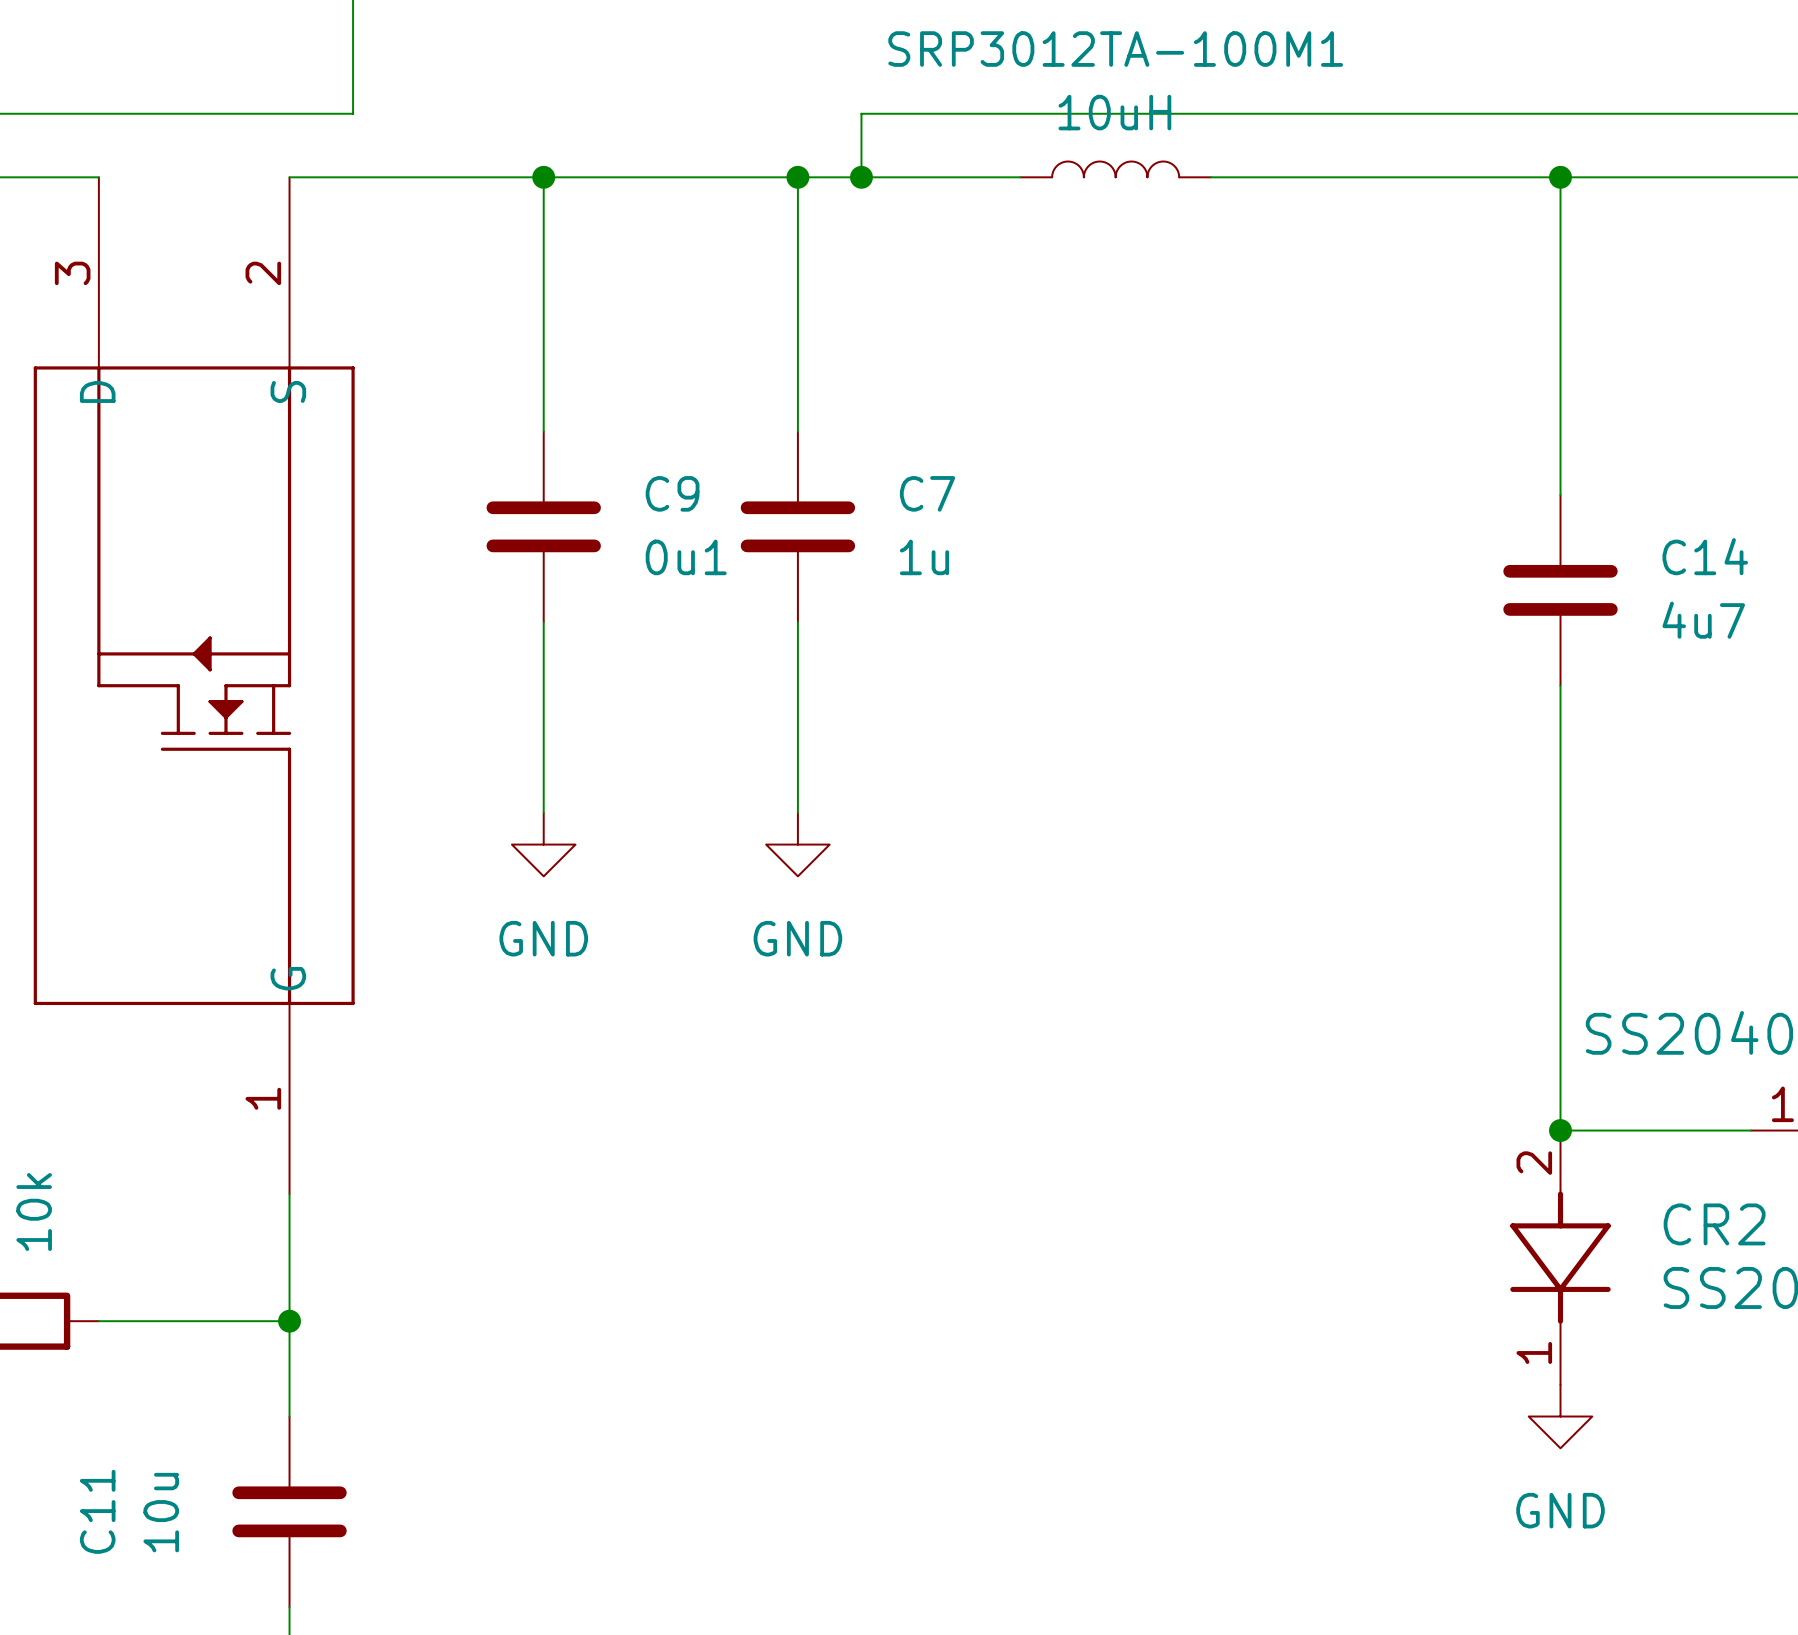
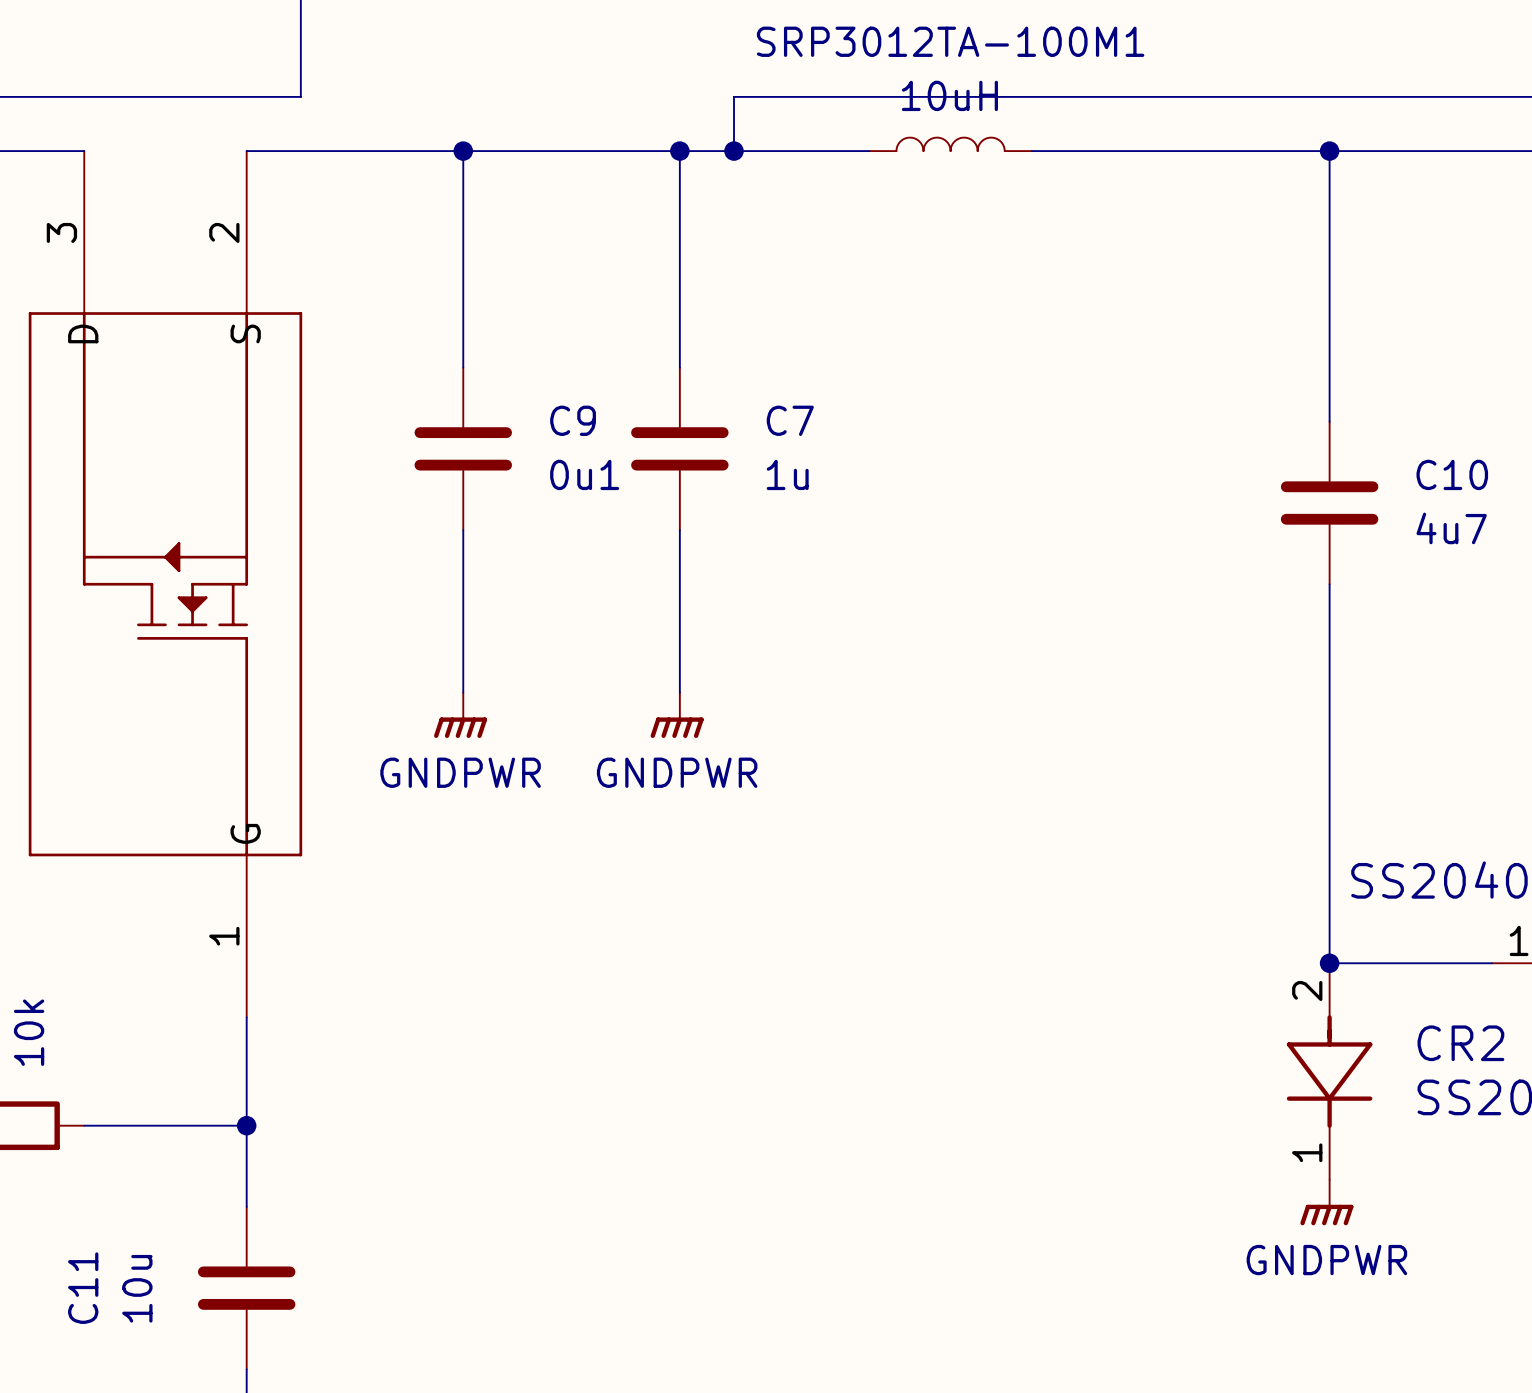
C14 name: C14 (1705, 556) -> C10 (1452, 474)
power symbol: GND (543, 844) -> GNDPWR (460, 715)
power symbol: GND (797, 844) -> GNDPWR (677, 715)
power symbol: GND (1560, 1416) -> GNDPWR (1326, 1202)

